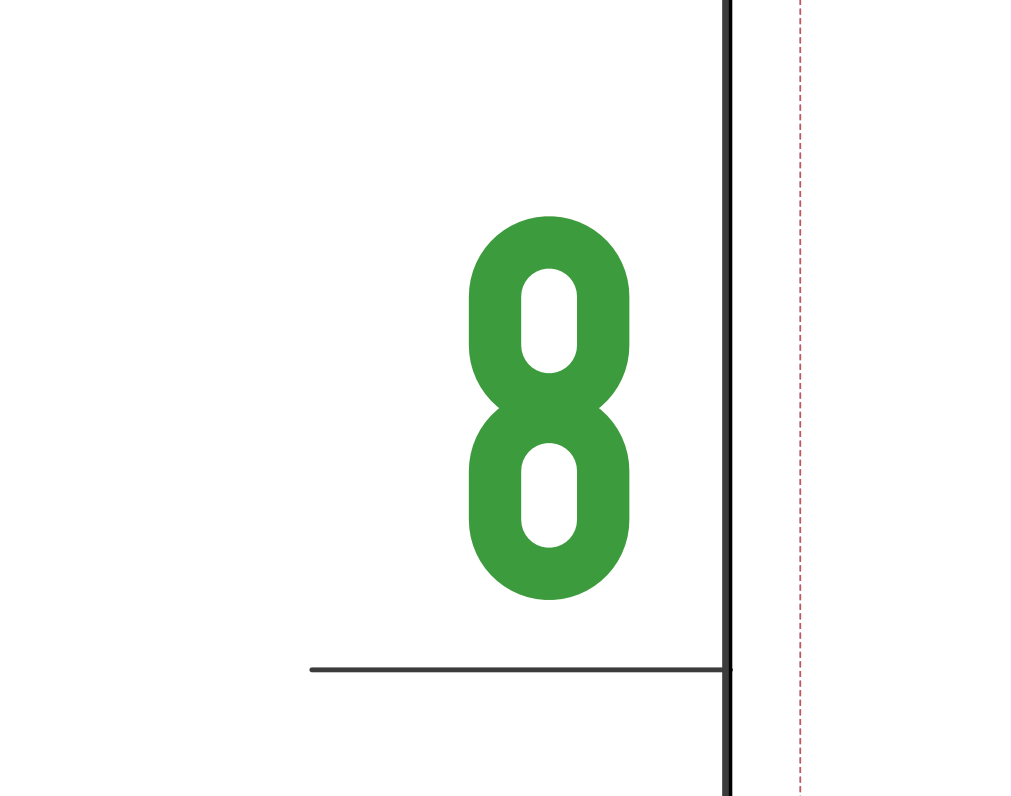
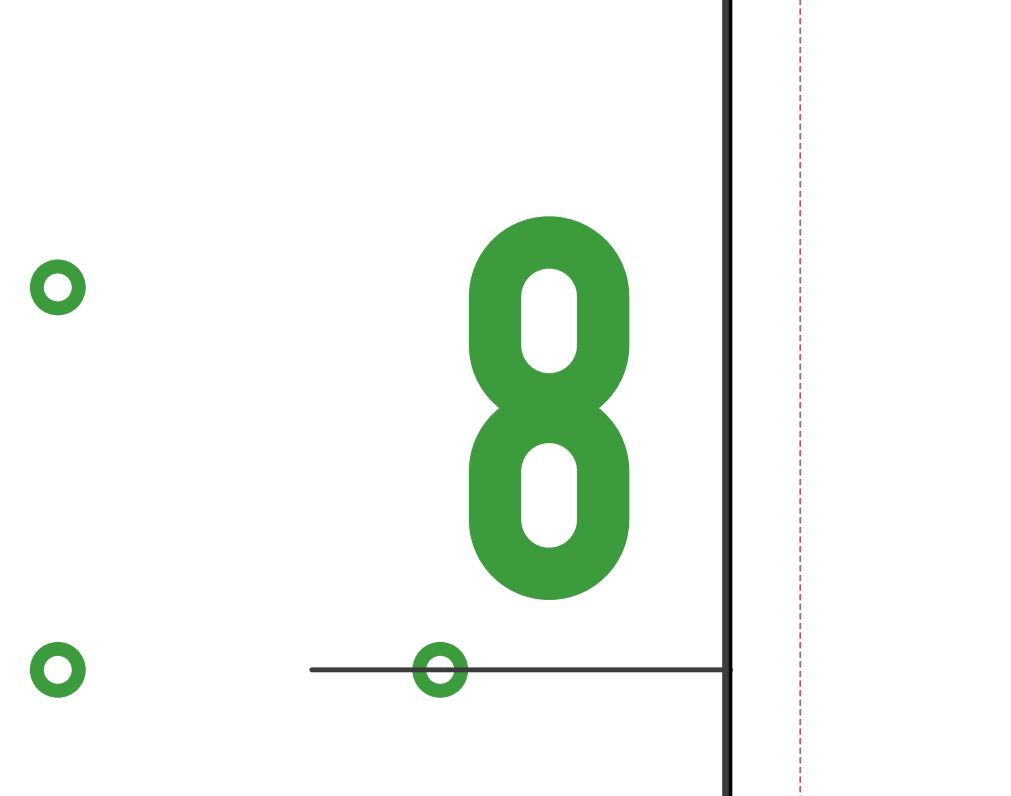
via: none -> (57, 287)
via: none -> (57, 669)
via: none -> (440, 669)

